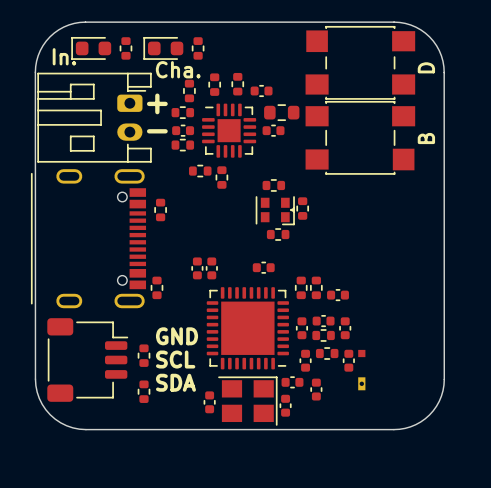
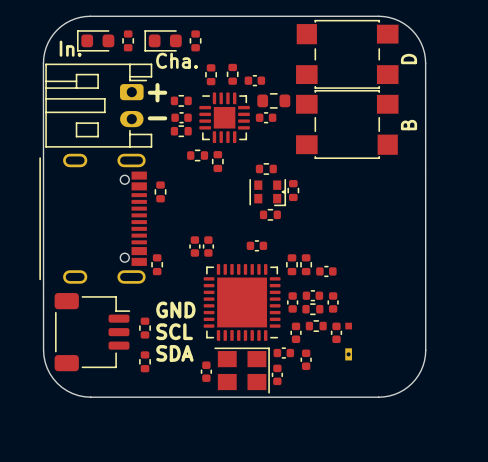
part: (189, 90) -> none

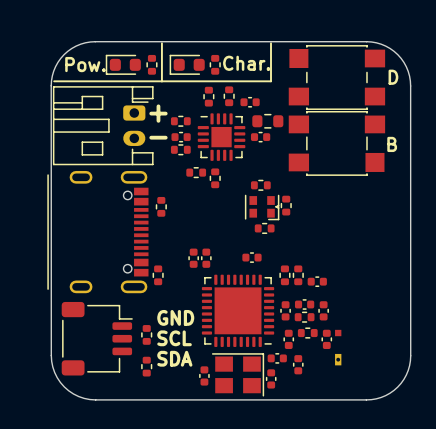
line: none -> (161, 43) (161, 81)
line: none -> (271, 43) (271, 81) (54, 81)
part footprint: [122, 30, 135, 52] -> [105, 54, 141, 75]
part footprint: [189, 30, 202, 52] -> [169, 54, 205, 75]
text: none -> Char. (246, 63)
part: (95, 40) -> none
part: none -> (151, 64)
part: (163, 40) -> none
part: none -> (215, 64)
text: In. (70, 48) -> Pow. (85, 64)
text rotation: 0° (409, 59) -> 90° clockwise (393, 77)
text: Cha. (177, 60) -> none
text rotation: 0° (409, 125) -> 90° clockwise (392, 144)

